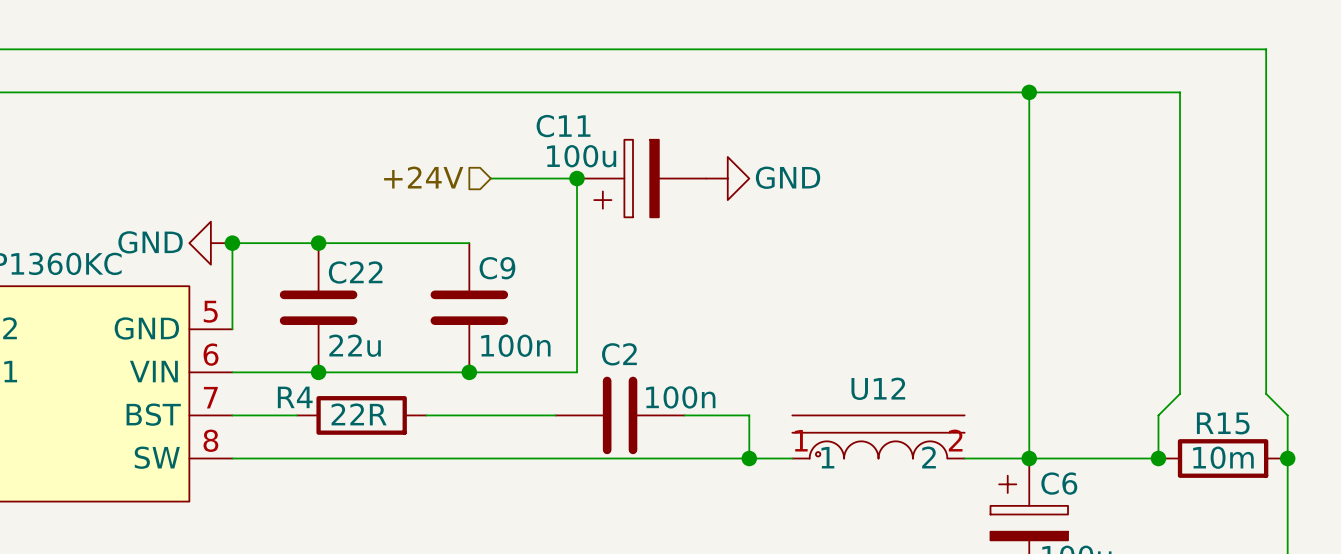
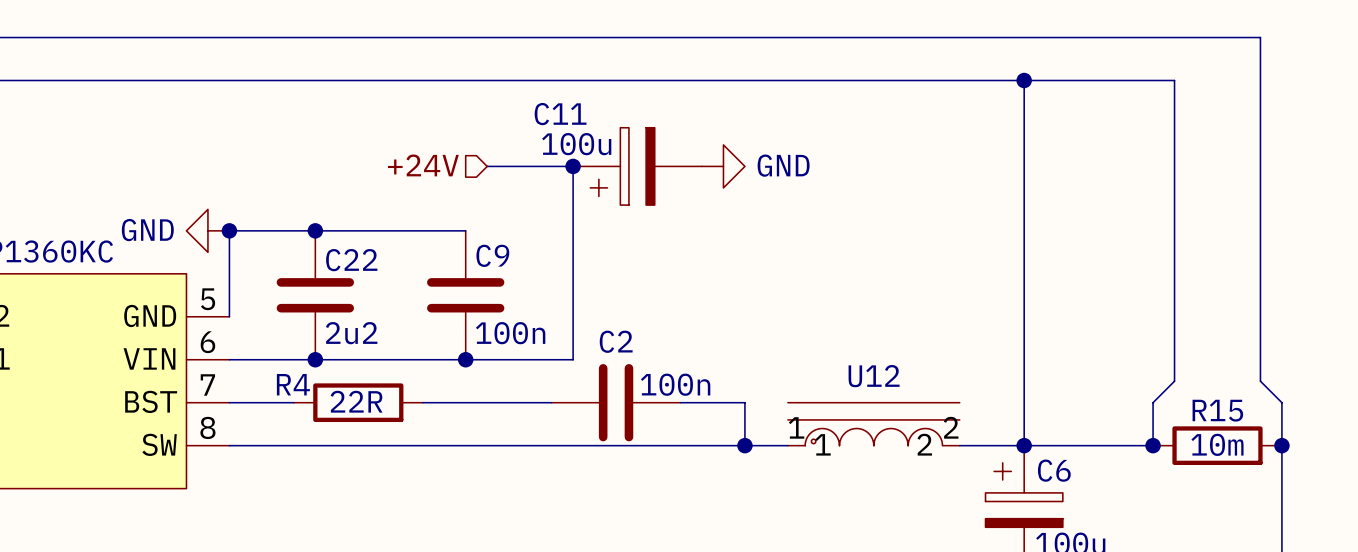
C22 value: 22u (355, 345) -> 2u2 (351, 333)

